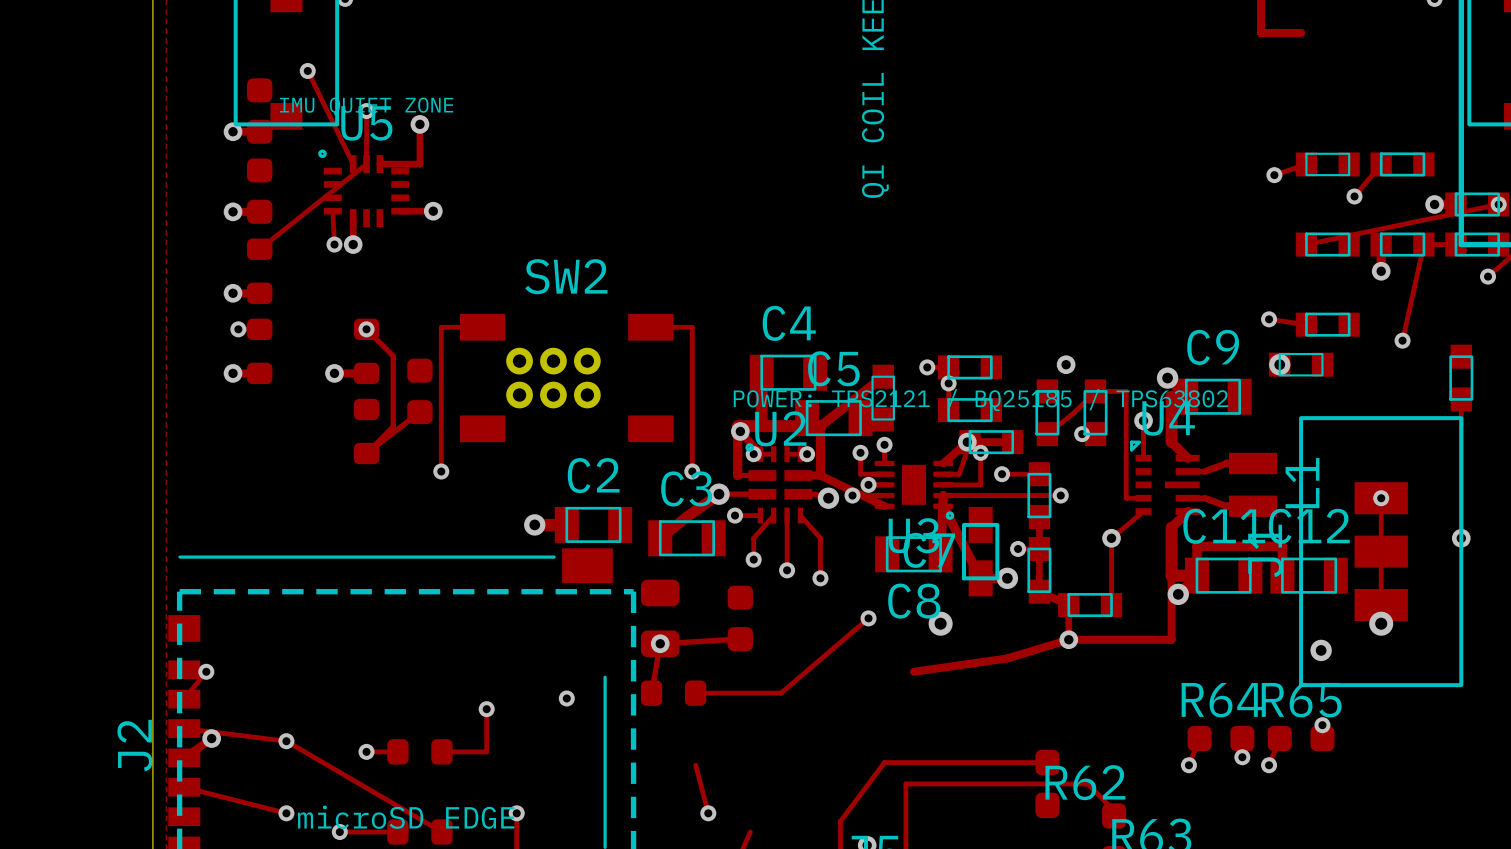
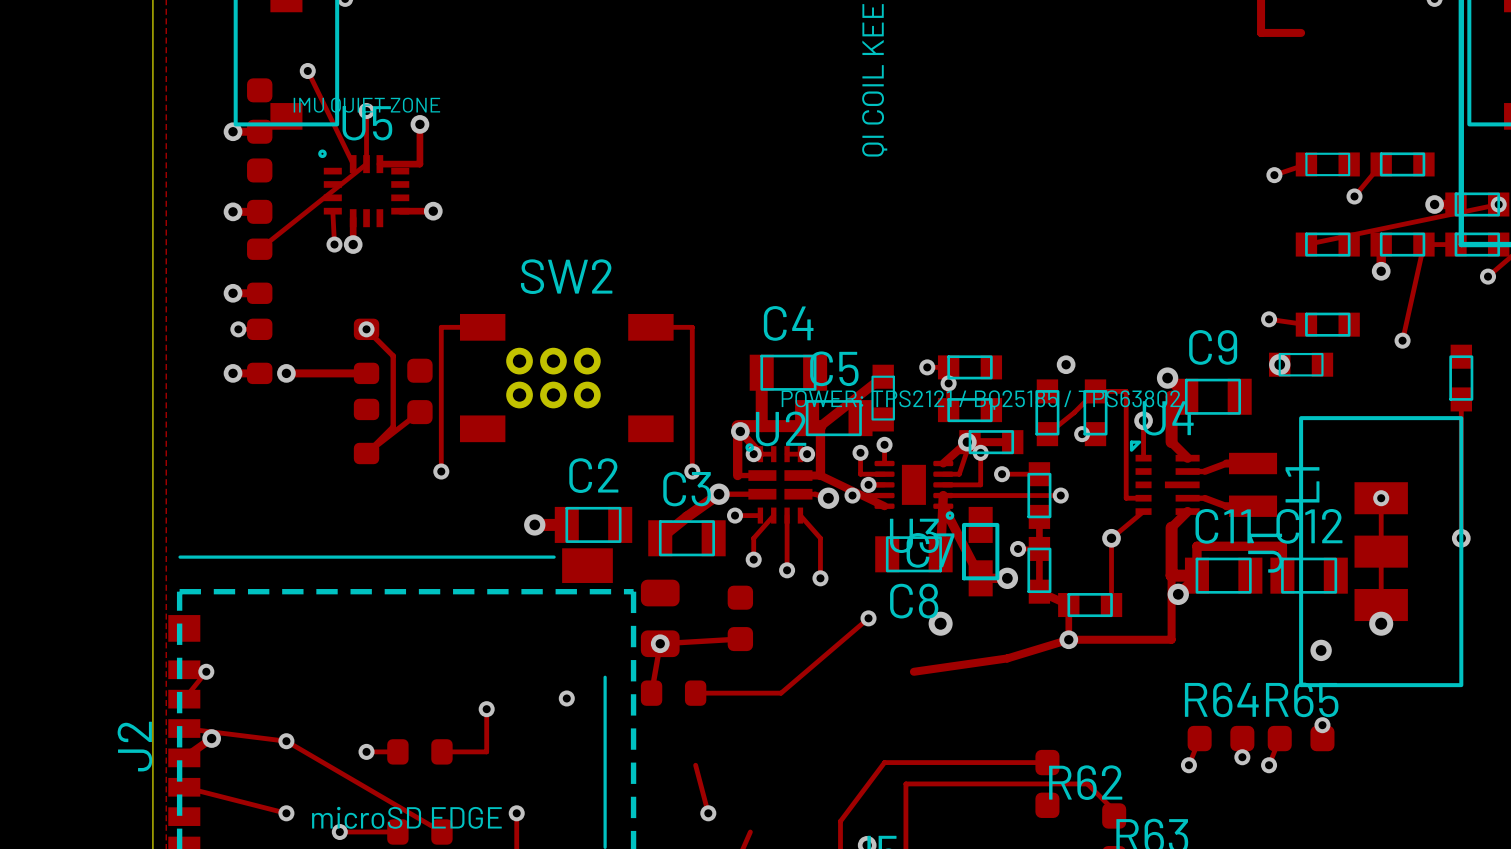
track: none -> (286, 373) (334, 373)
via position: (334, 373) -> (286, 373)

